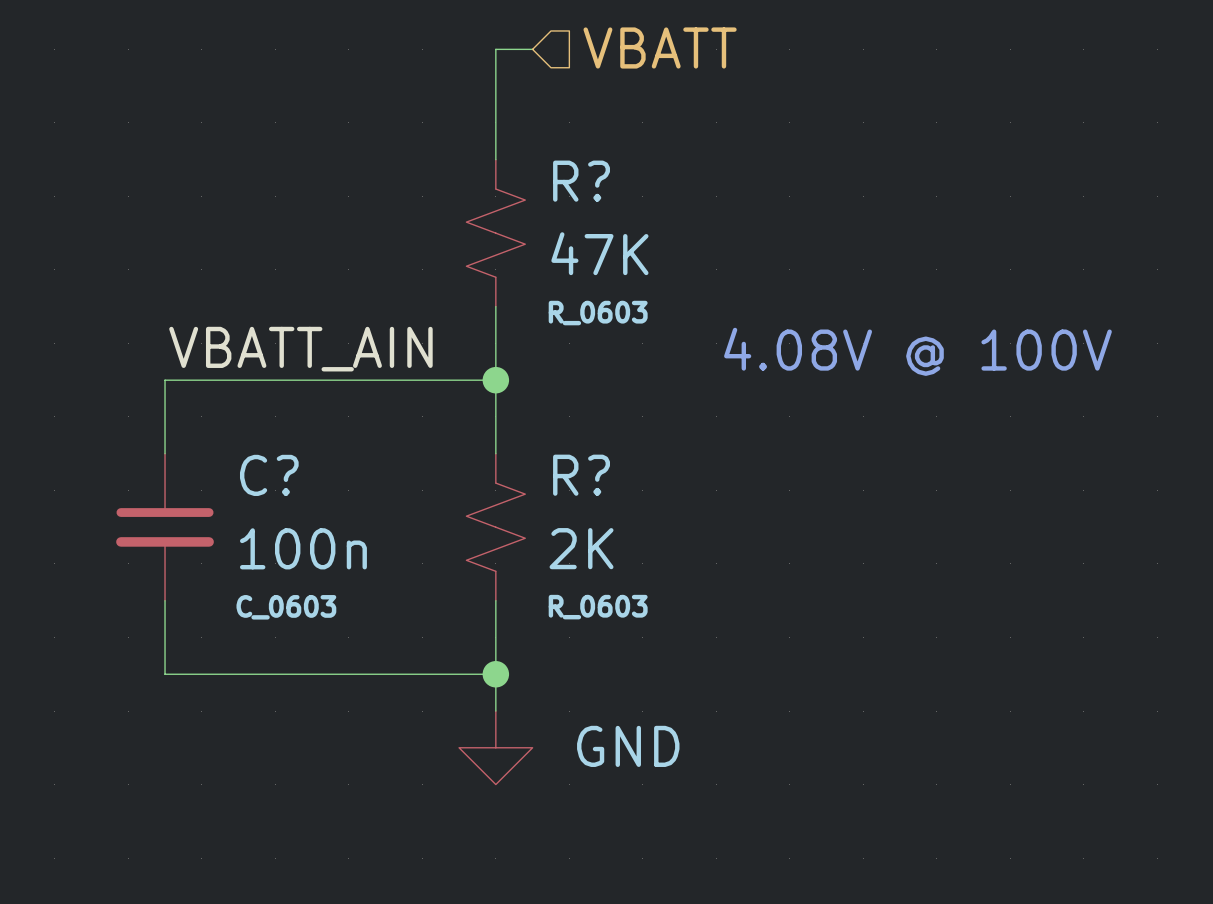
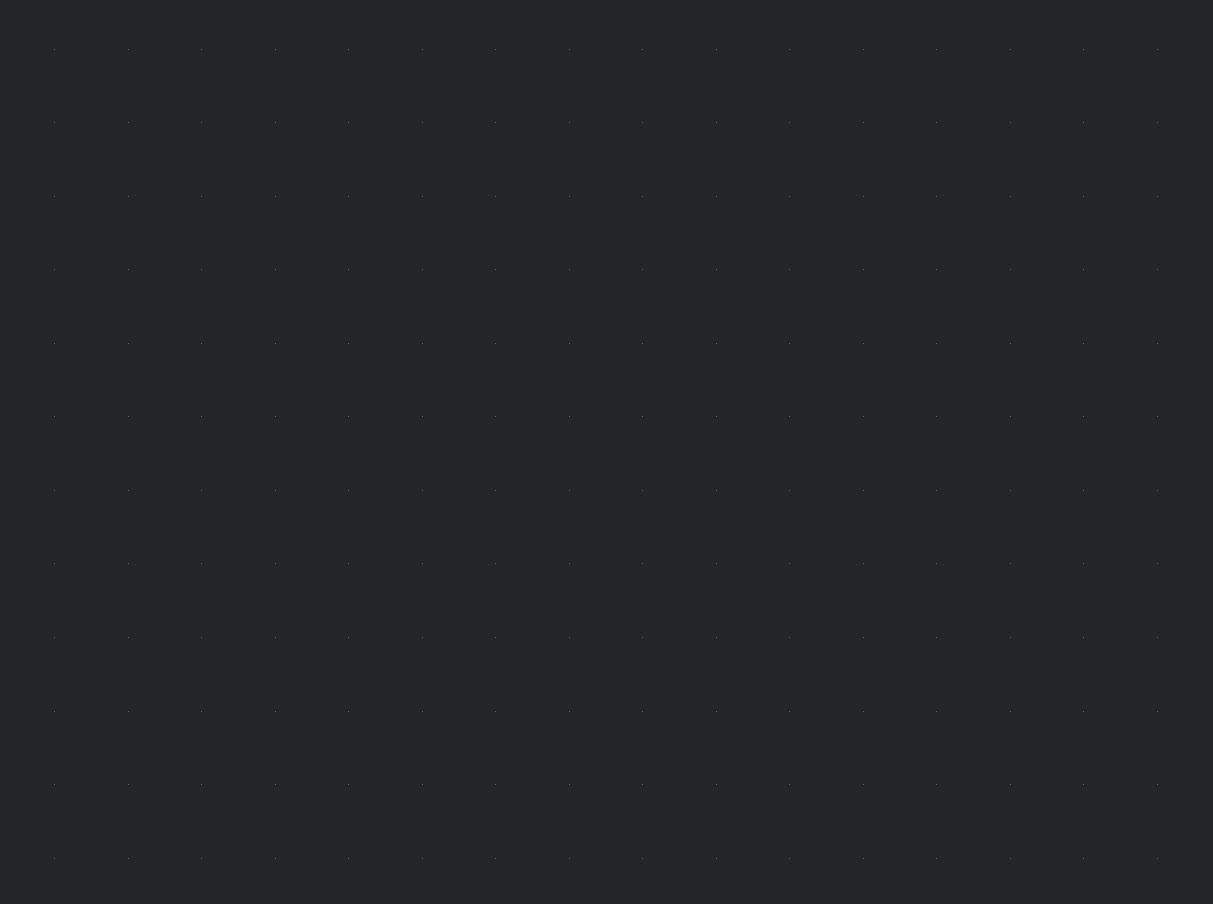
hierarchical label: VBATT (660, 47) -> none
wire: (532, 49) (495, 49) (495, 159) -> none
R?: 47K (495, 233) -> none
wire: (495, 306) (495, 453) -> none
label: VBATT_AIN (300, 349) -> none
text: 4.08V @ 100V (917, 351) -> none
wire: (495, 380) (165, 380) (165, 453) -> none
junction: (495, 380) -> none
C?: 100n (165, 527) -> none
R?: 2K (495, 527) -> none
wire: (165, 600) (165, 674) (495, 674) -> none
wire: (495, 600) (495, 711) -> none
junction: (495, 674) -> none
power symbol: GND (495, 747) -> none

